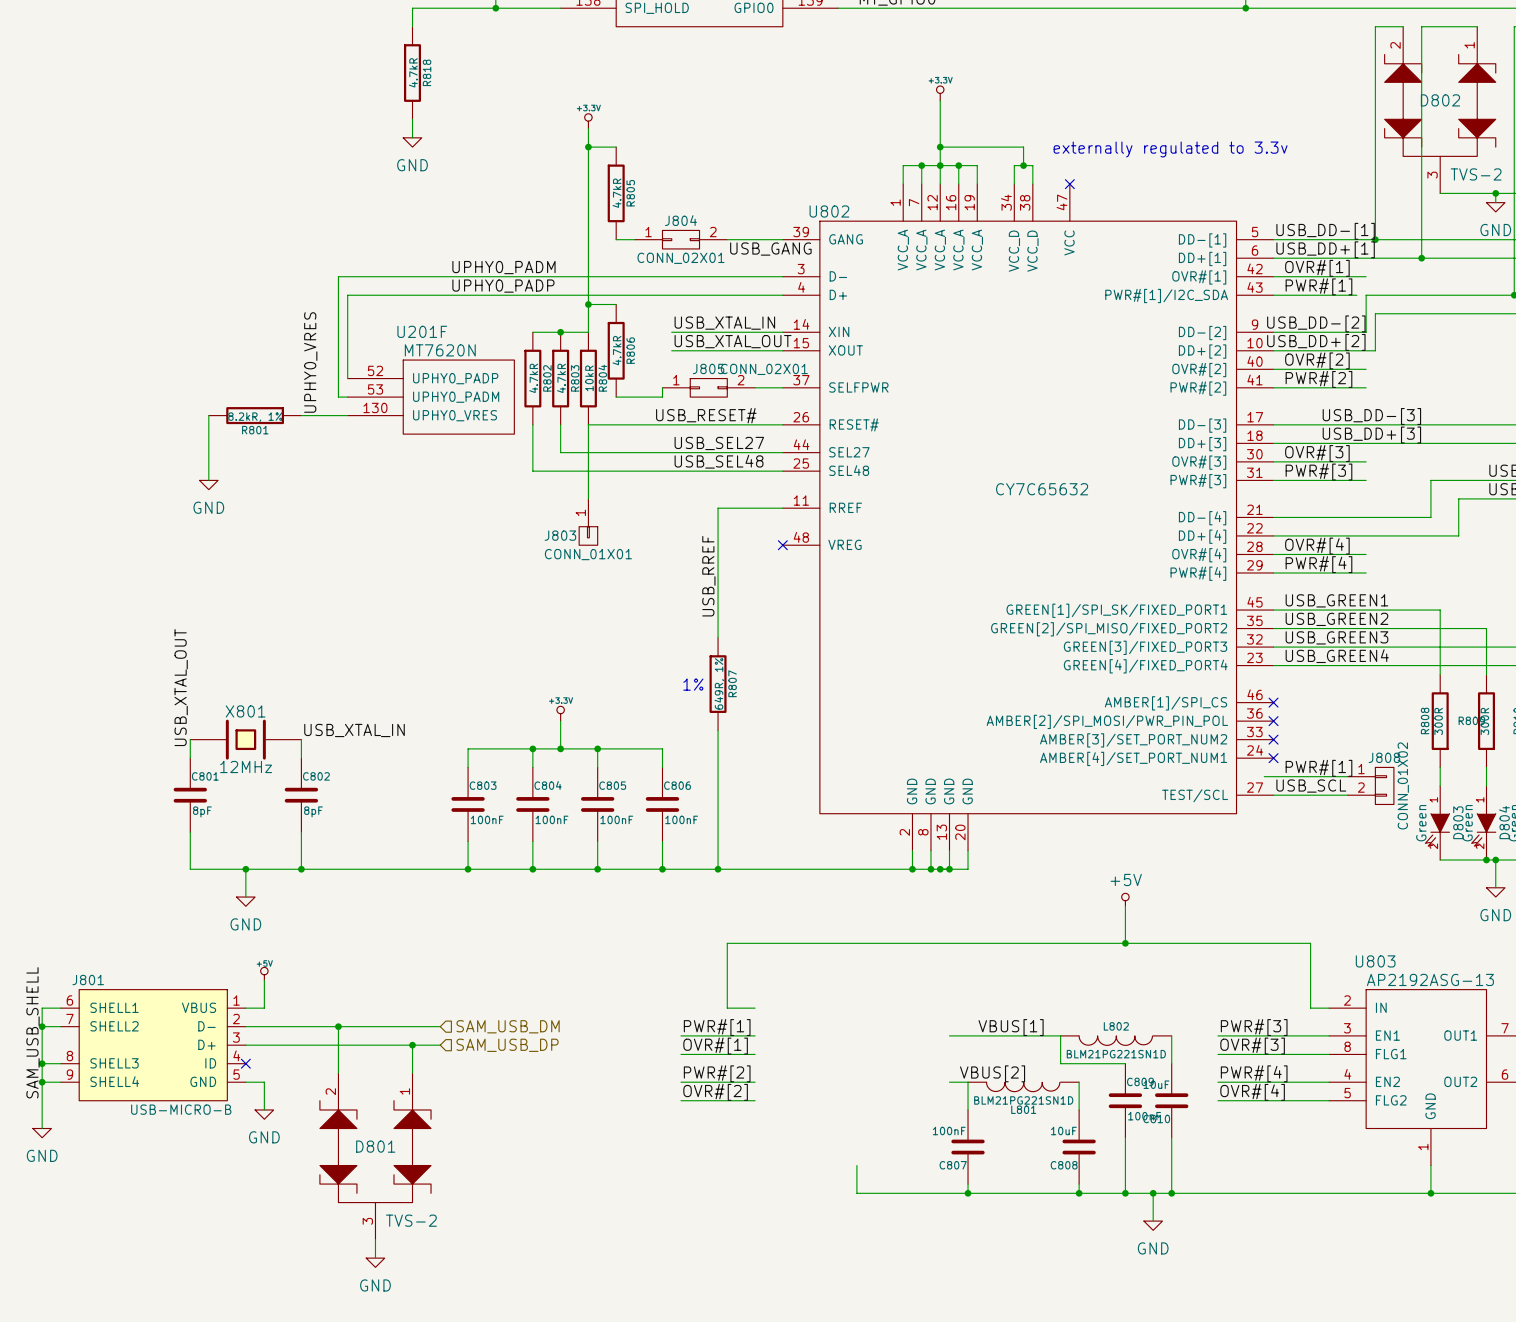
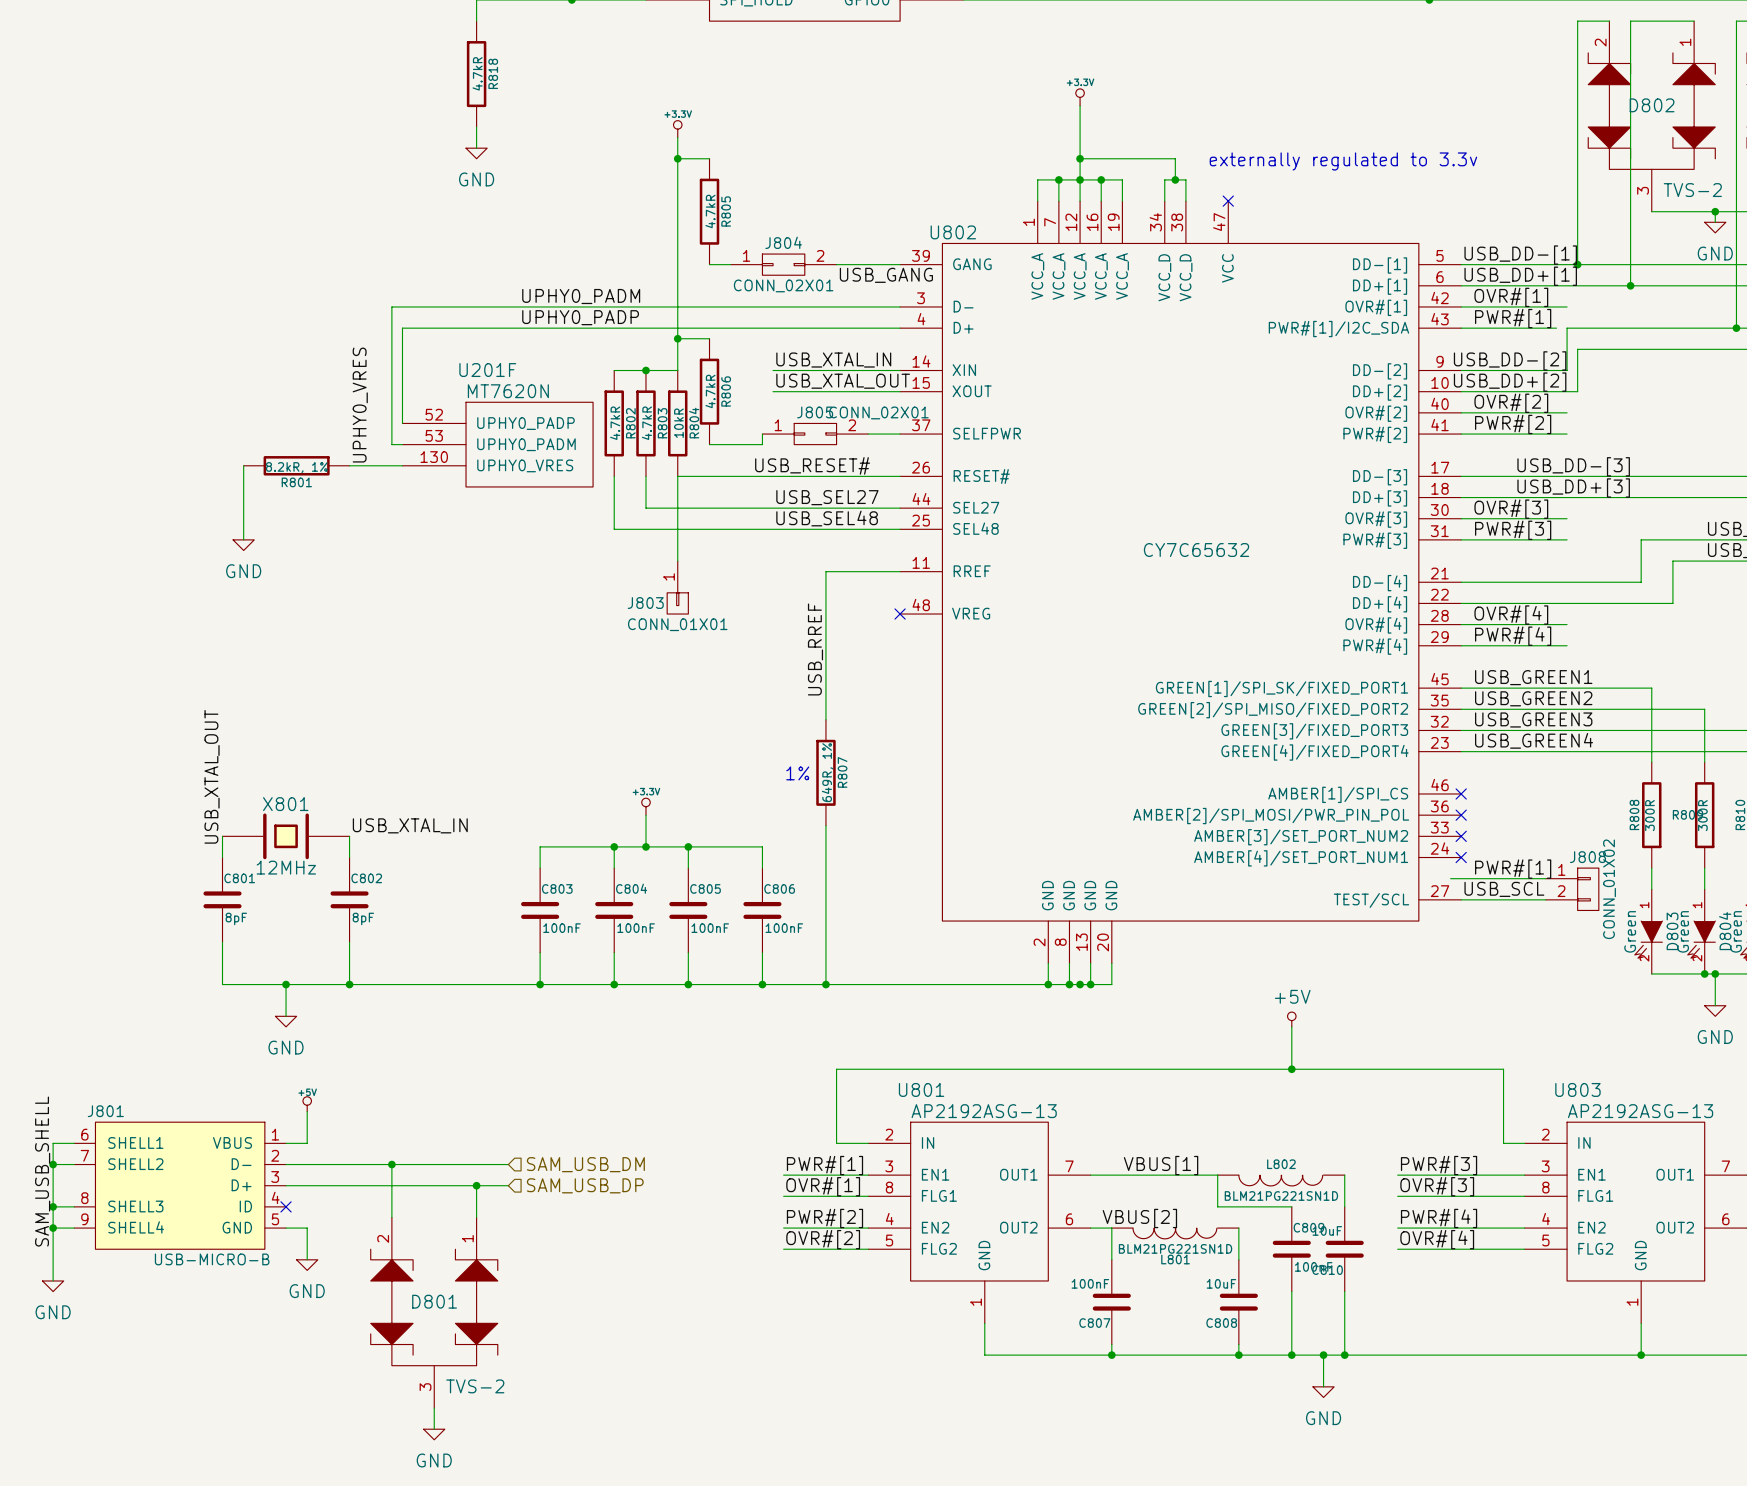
U801: none -> AP2192ASG-13 (979, 1222)

